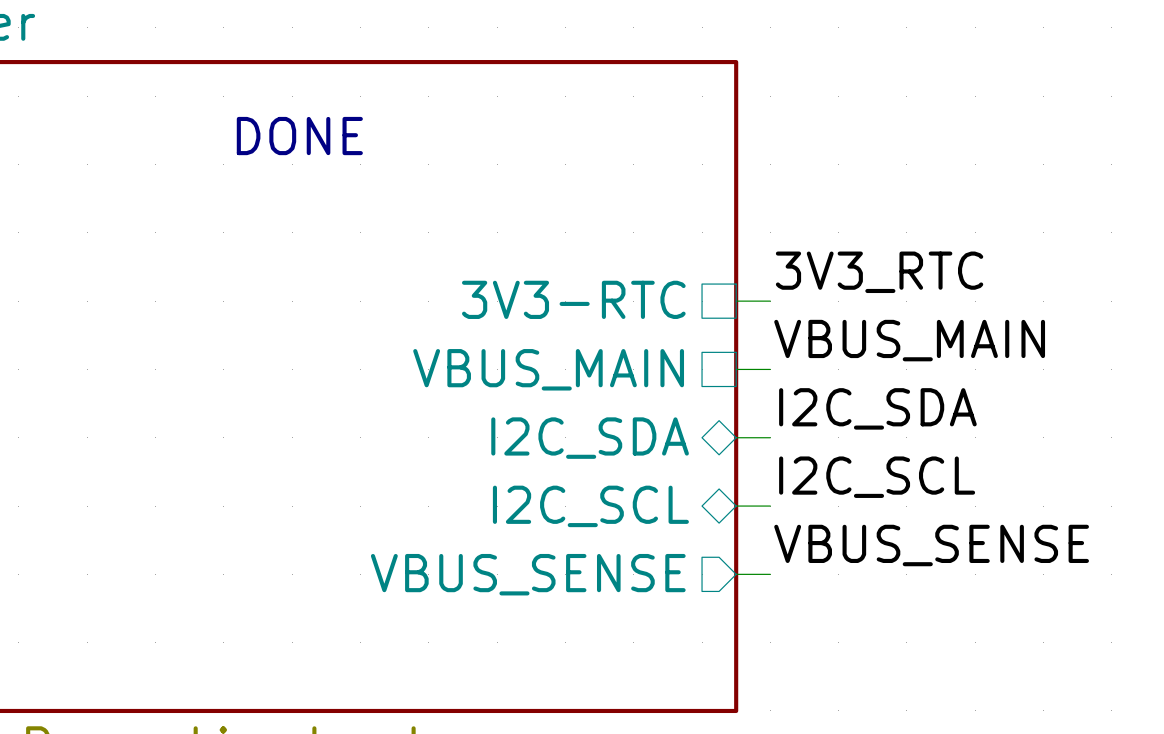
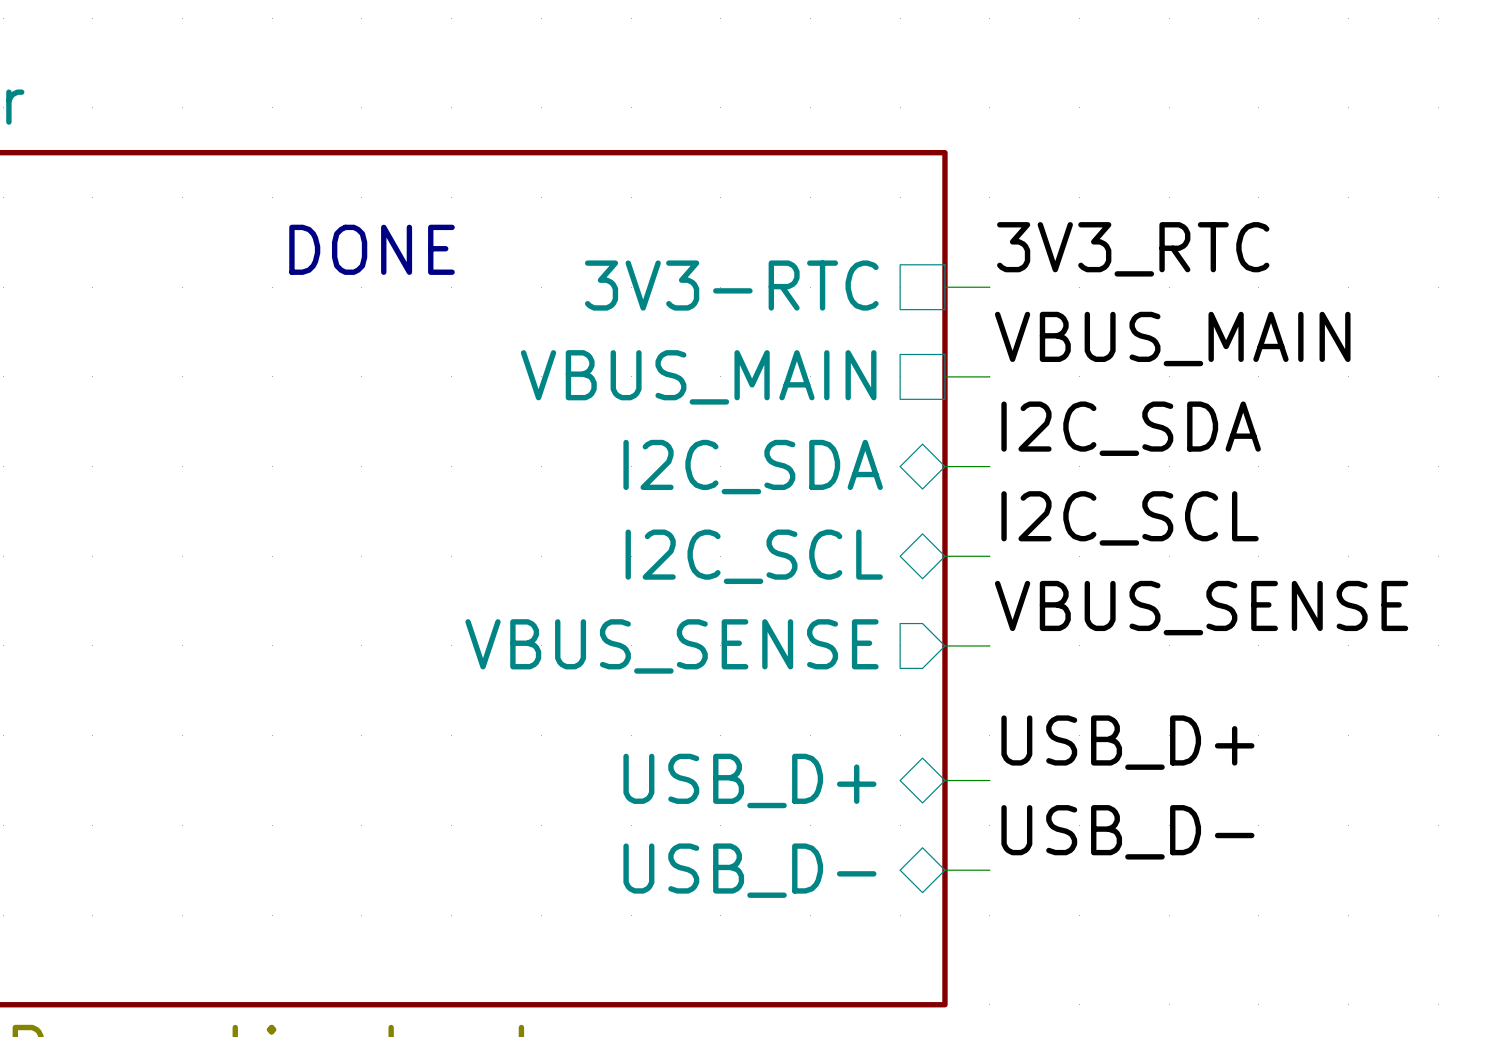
label: none -> 3V3_RTC (1133, 249)
sheet pin: none -> 3V3-RTC (731, 285)
wire: none -> (944, 287) (989, 287)
label: none -> VBUS_MAIN (1172, 339)
wire: none -> (944, 376) (989, 376)
sheet pin: none -> VBUS_MAIN (698, 377)
label: 3V3_RTC (879, 272) -> I2C_SDA (1131, 428)
sheet pin shape: passive (573, 299) -> bidirectional (753, 467)
sheet pin: 3V3-RTC (573, 299) -> I2C_SDA (753, 467)
label: VBUS_MAIN (909, 340) -> I2C_SCL (1130, 518)
sheet pin shape: passive (548, 369) -> bidirectional (754, 556)
sheet pin: VBUS_MAIN (548, 369) -> I2C_SCL (754, 556)
label: I2C_SDA (877, 408) -> VBUS_SENSE (1201, 608)
sheet pin shape: bidirectional (590, 438) -> output (672, 646)
sheet pin: I2C_SDA (590, 438) -> VBUS_SENSE (672, 646)
label: I2C_SCL (877, 477) -> none
sheet pin: I2C_SCL (590, 506) -> none
wire: (736, 506) (770, 506) -> (944, 780) (989, 780)
label: none -> USB_D+ (1127, 742)
sheet pin: none -> USB_D+ (749, 780)
label: VBUS_SENSE (931, 545) -> none
sheet pin: VBUS_SENSE (528, 574) -> none
wire: (736, 574) (770, 574) -> (944, 870) (989, 870)
label: none -> USB_D- (1127, 832)
sheet pin: none -> USB_D- (749, 870)

